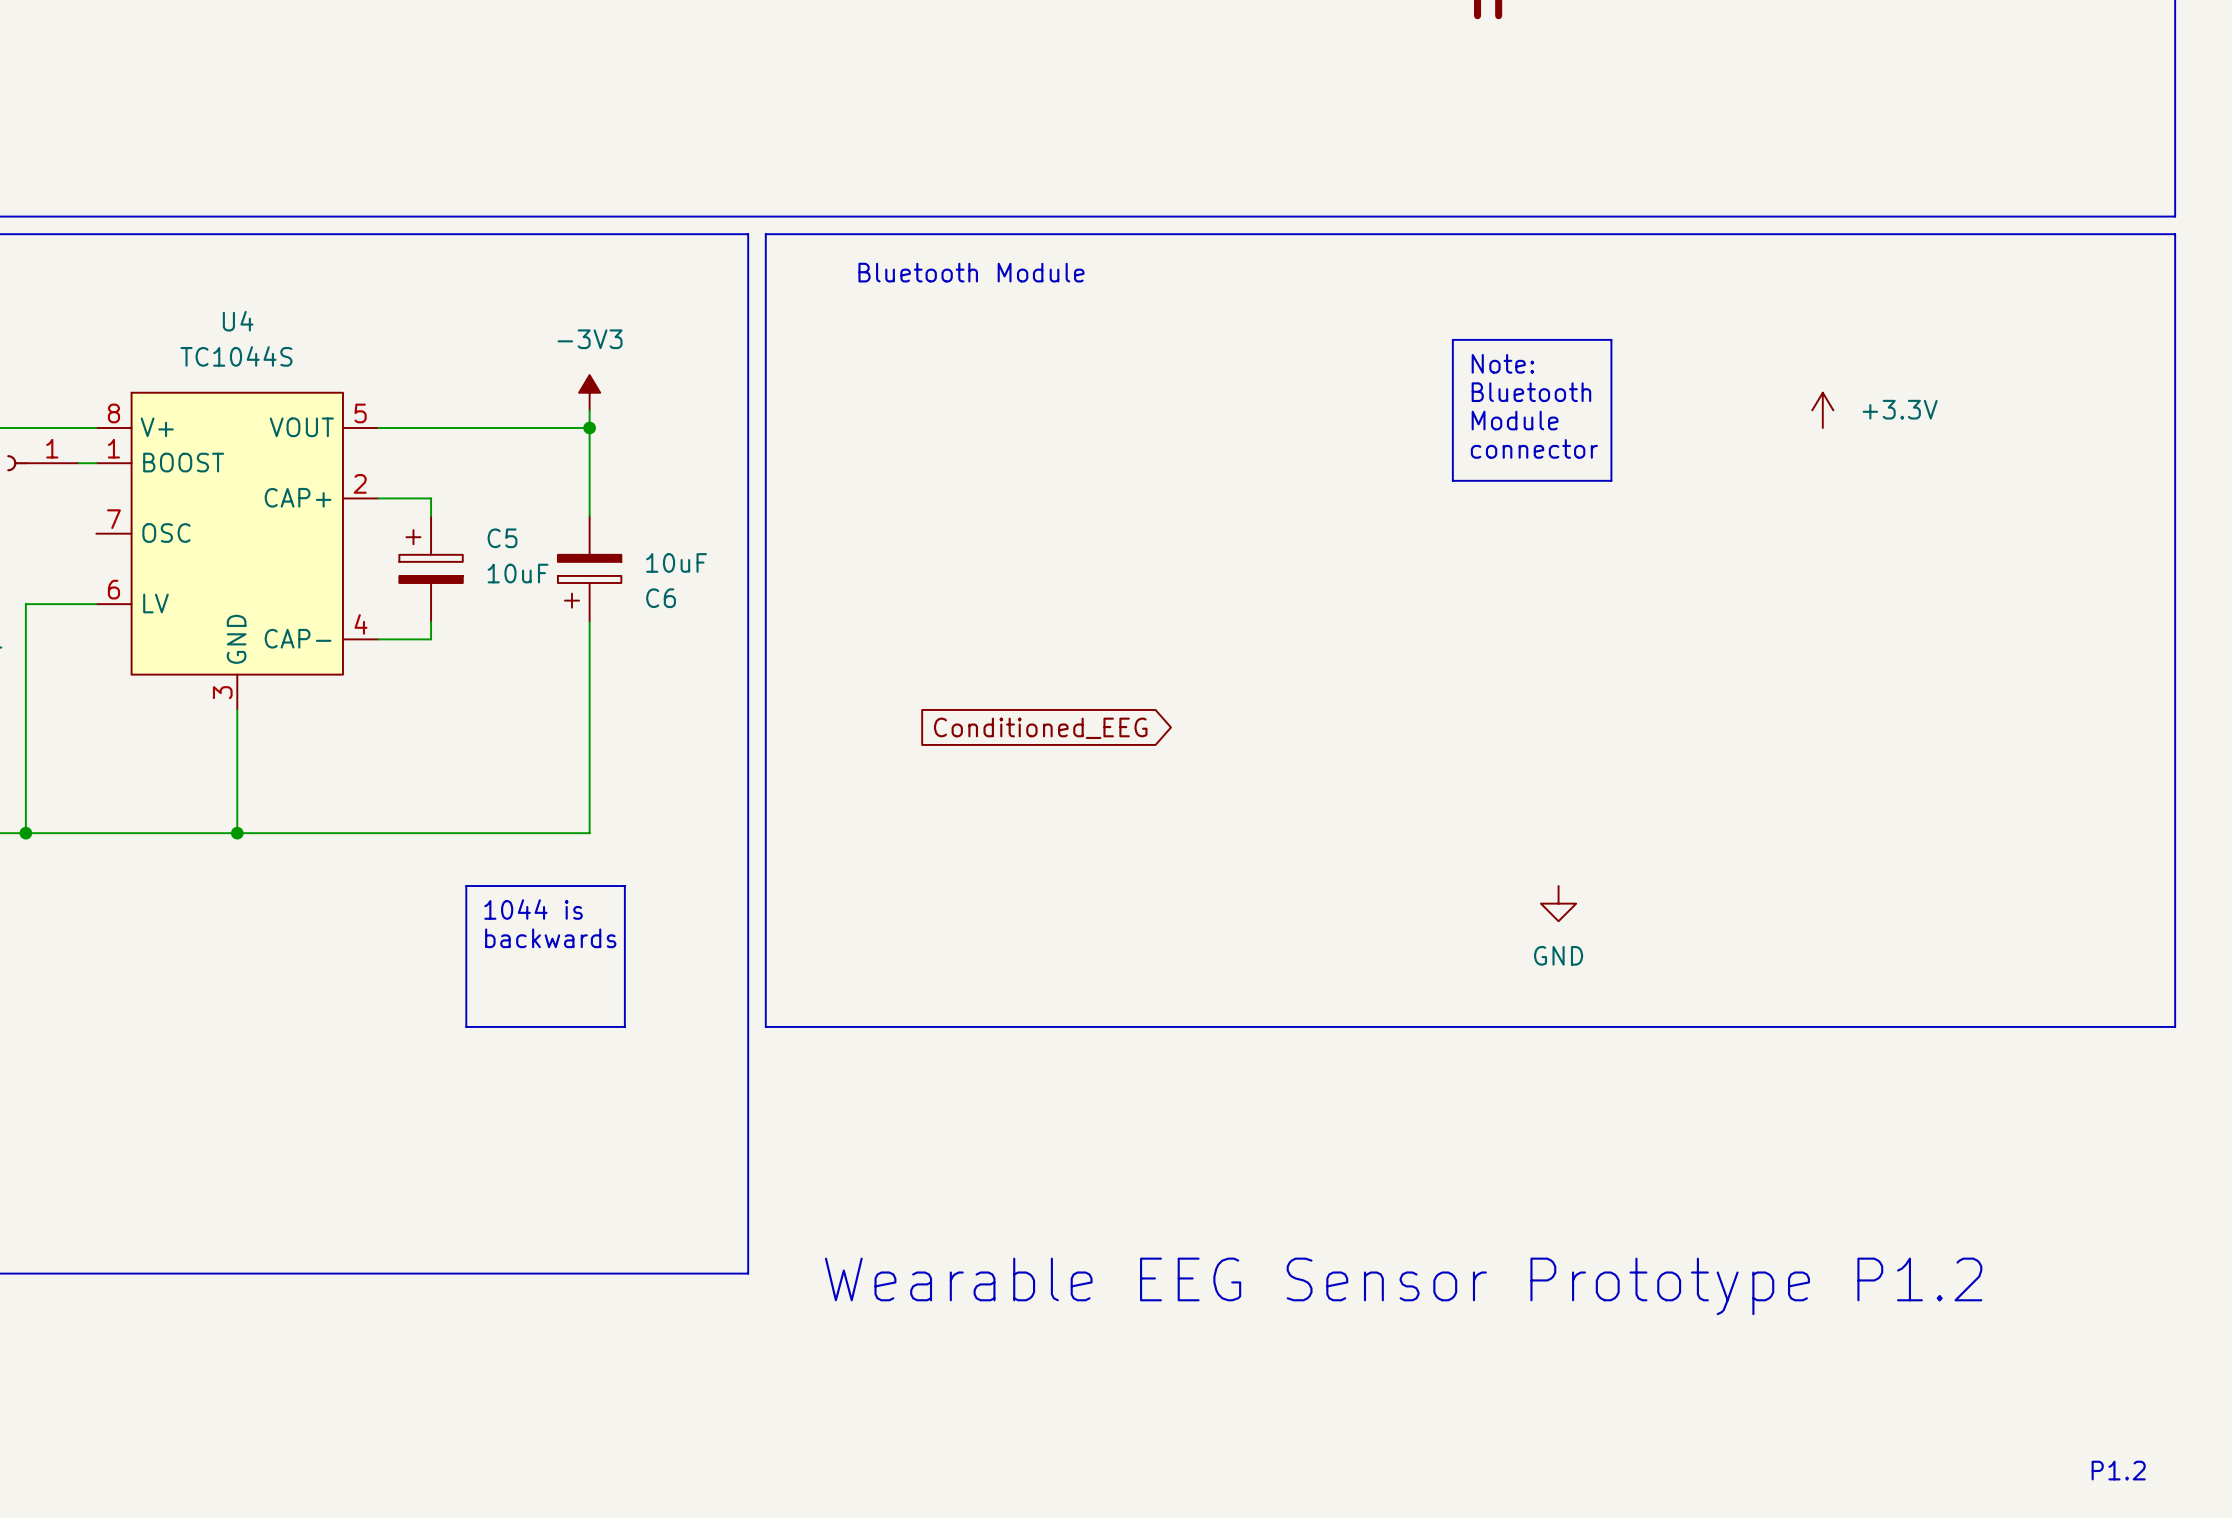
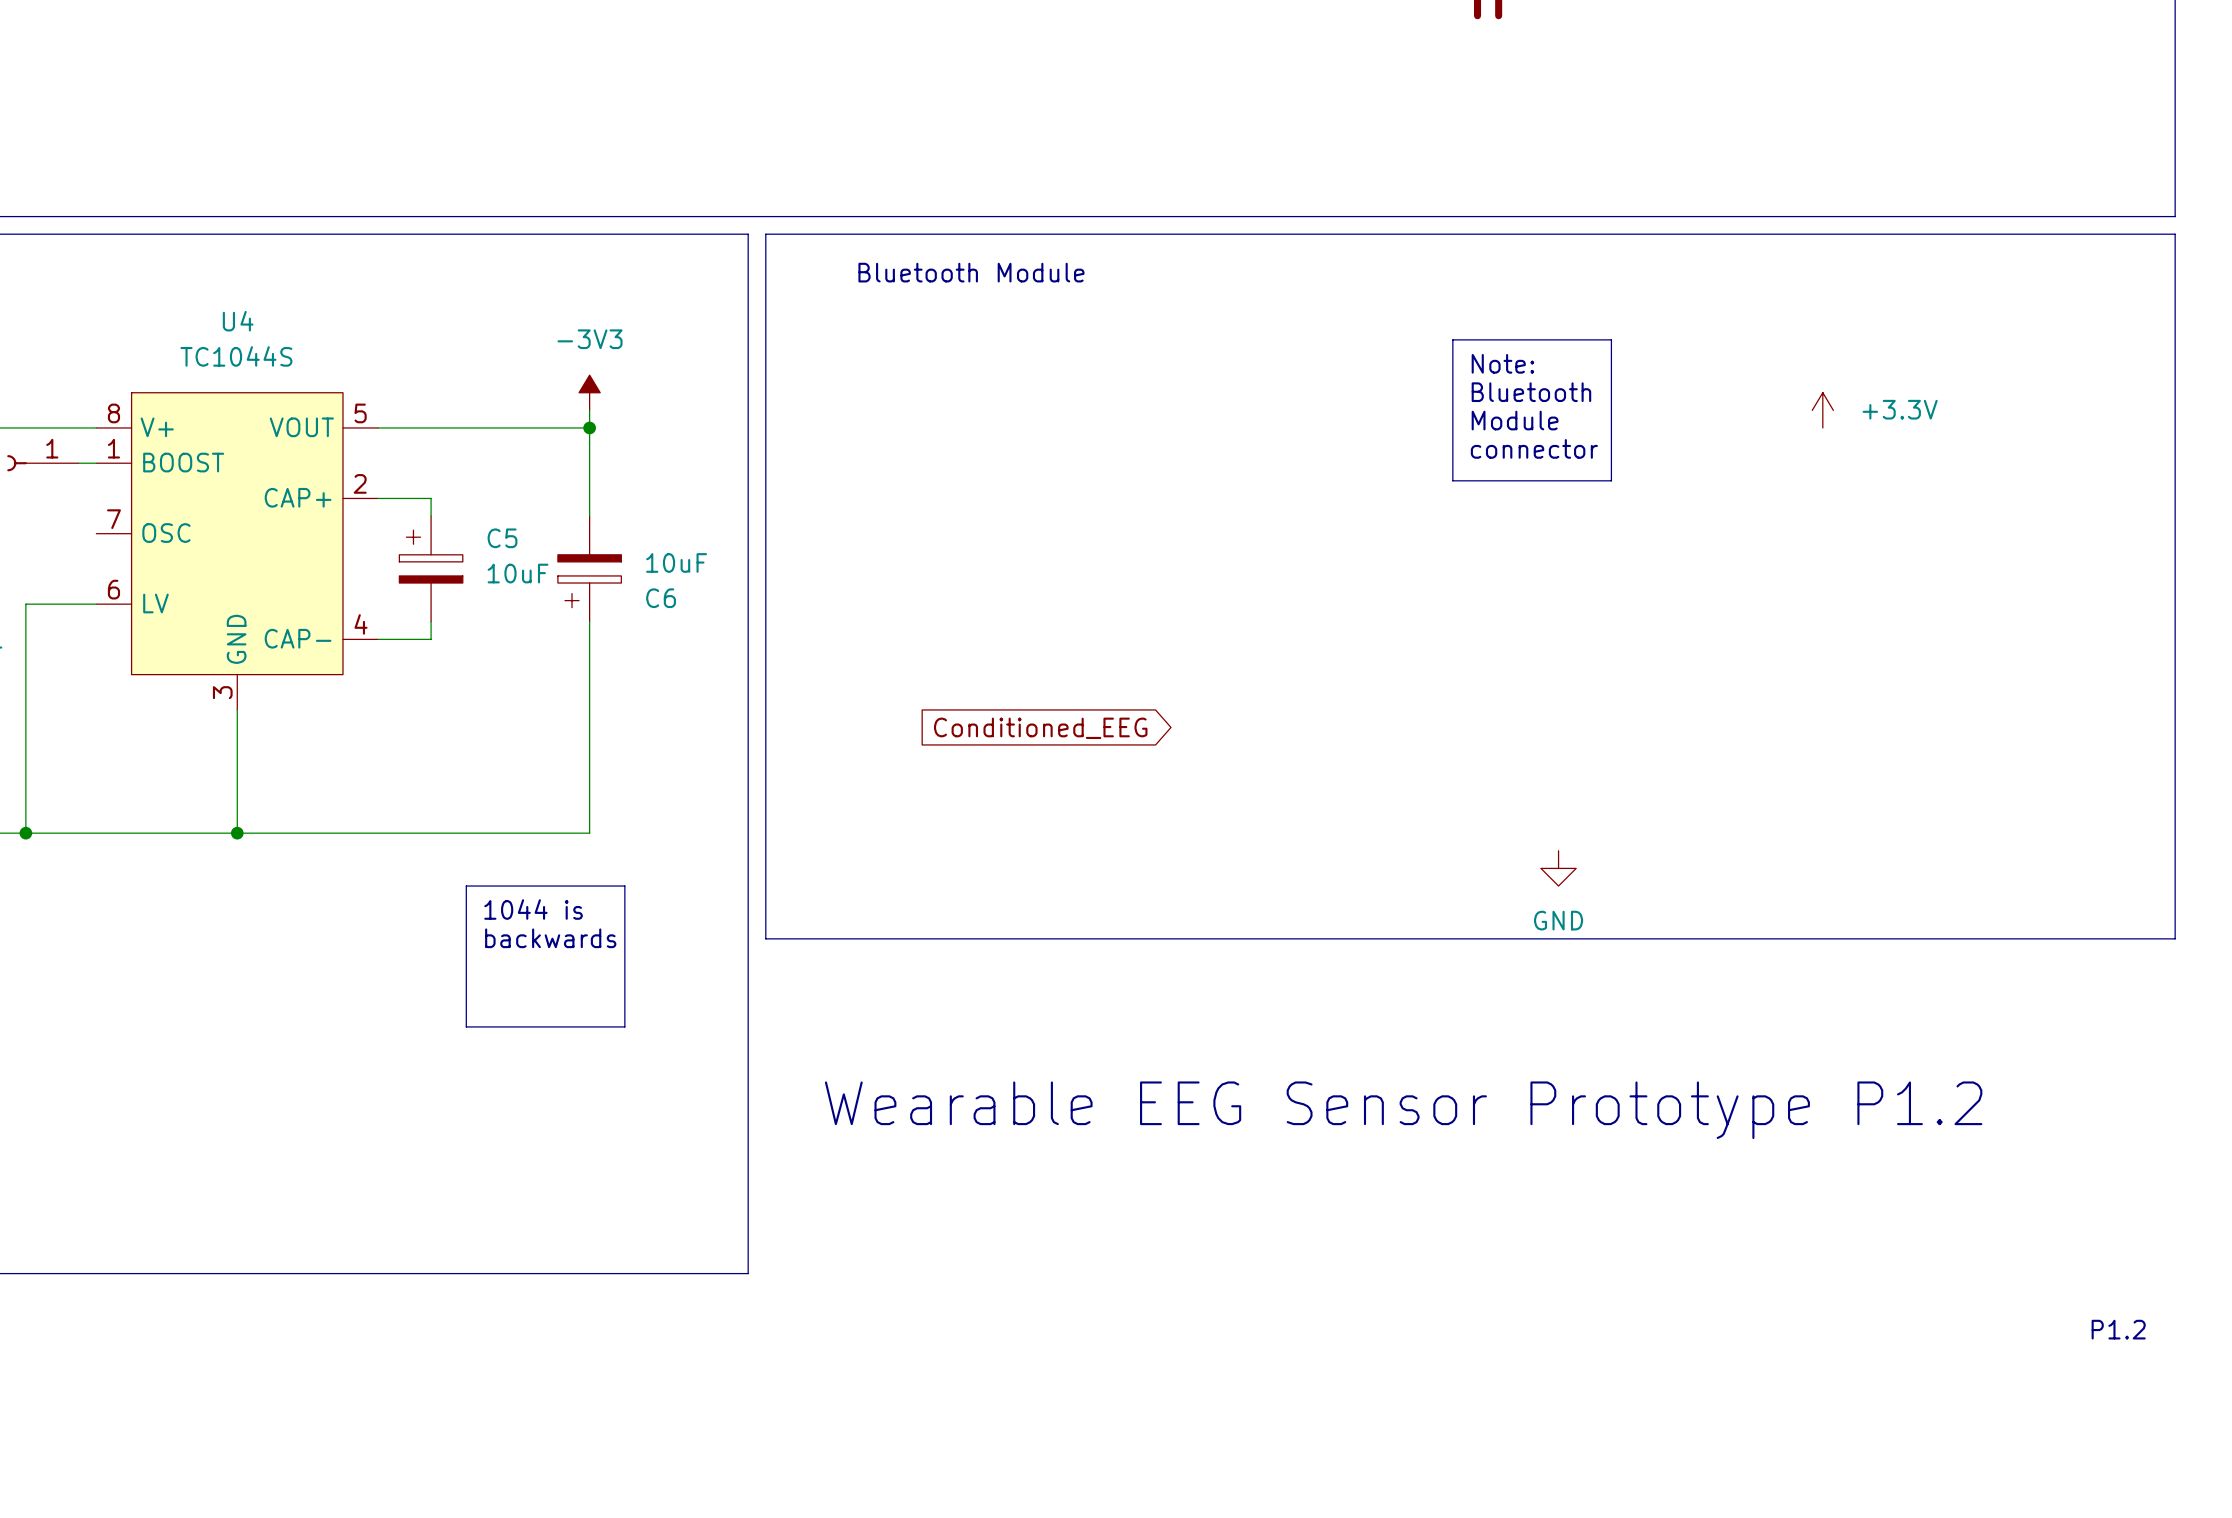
power symbol position: GND (1558, 903) -> GND (1558, 868)
line: (765, 938) (765, 1026) (2175, 1026) (2175, 938) -> (765, 938) (2175, 938)
text position: Wearable EEG Sensor Prototype P1.2 (1403, 1286) -> Wearable EEG Sensor Prototype P1.2 (1403, 1110)
text position: P1.2 (2118, 1470) -> P1.2 (2118, 1329)

